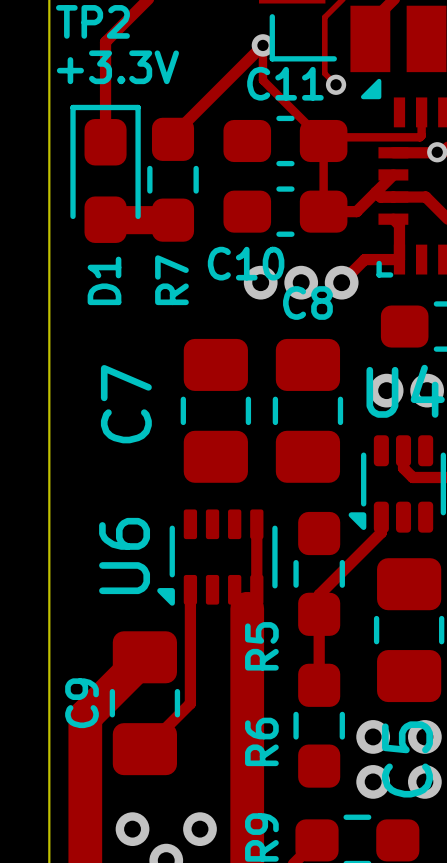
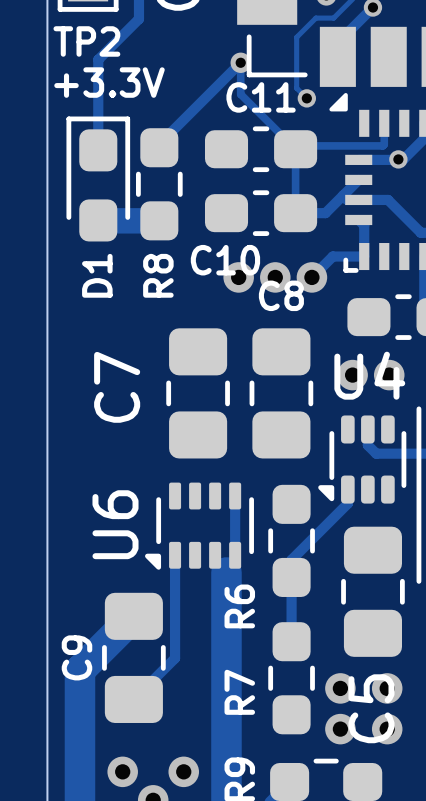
R7 name: R7 (171, 280) -> R8 (158, 275)
R5 name: R5 (261, 646) -> R6 (239, 606)
R6 name: R6 (261, 741) -> R7 (239, 692)

